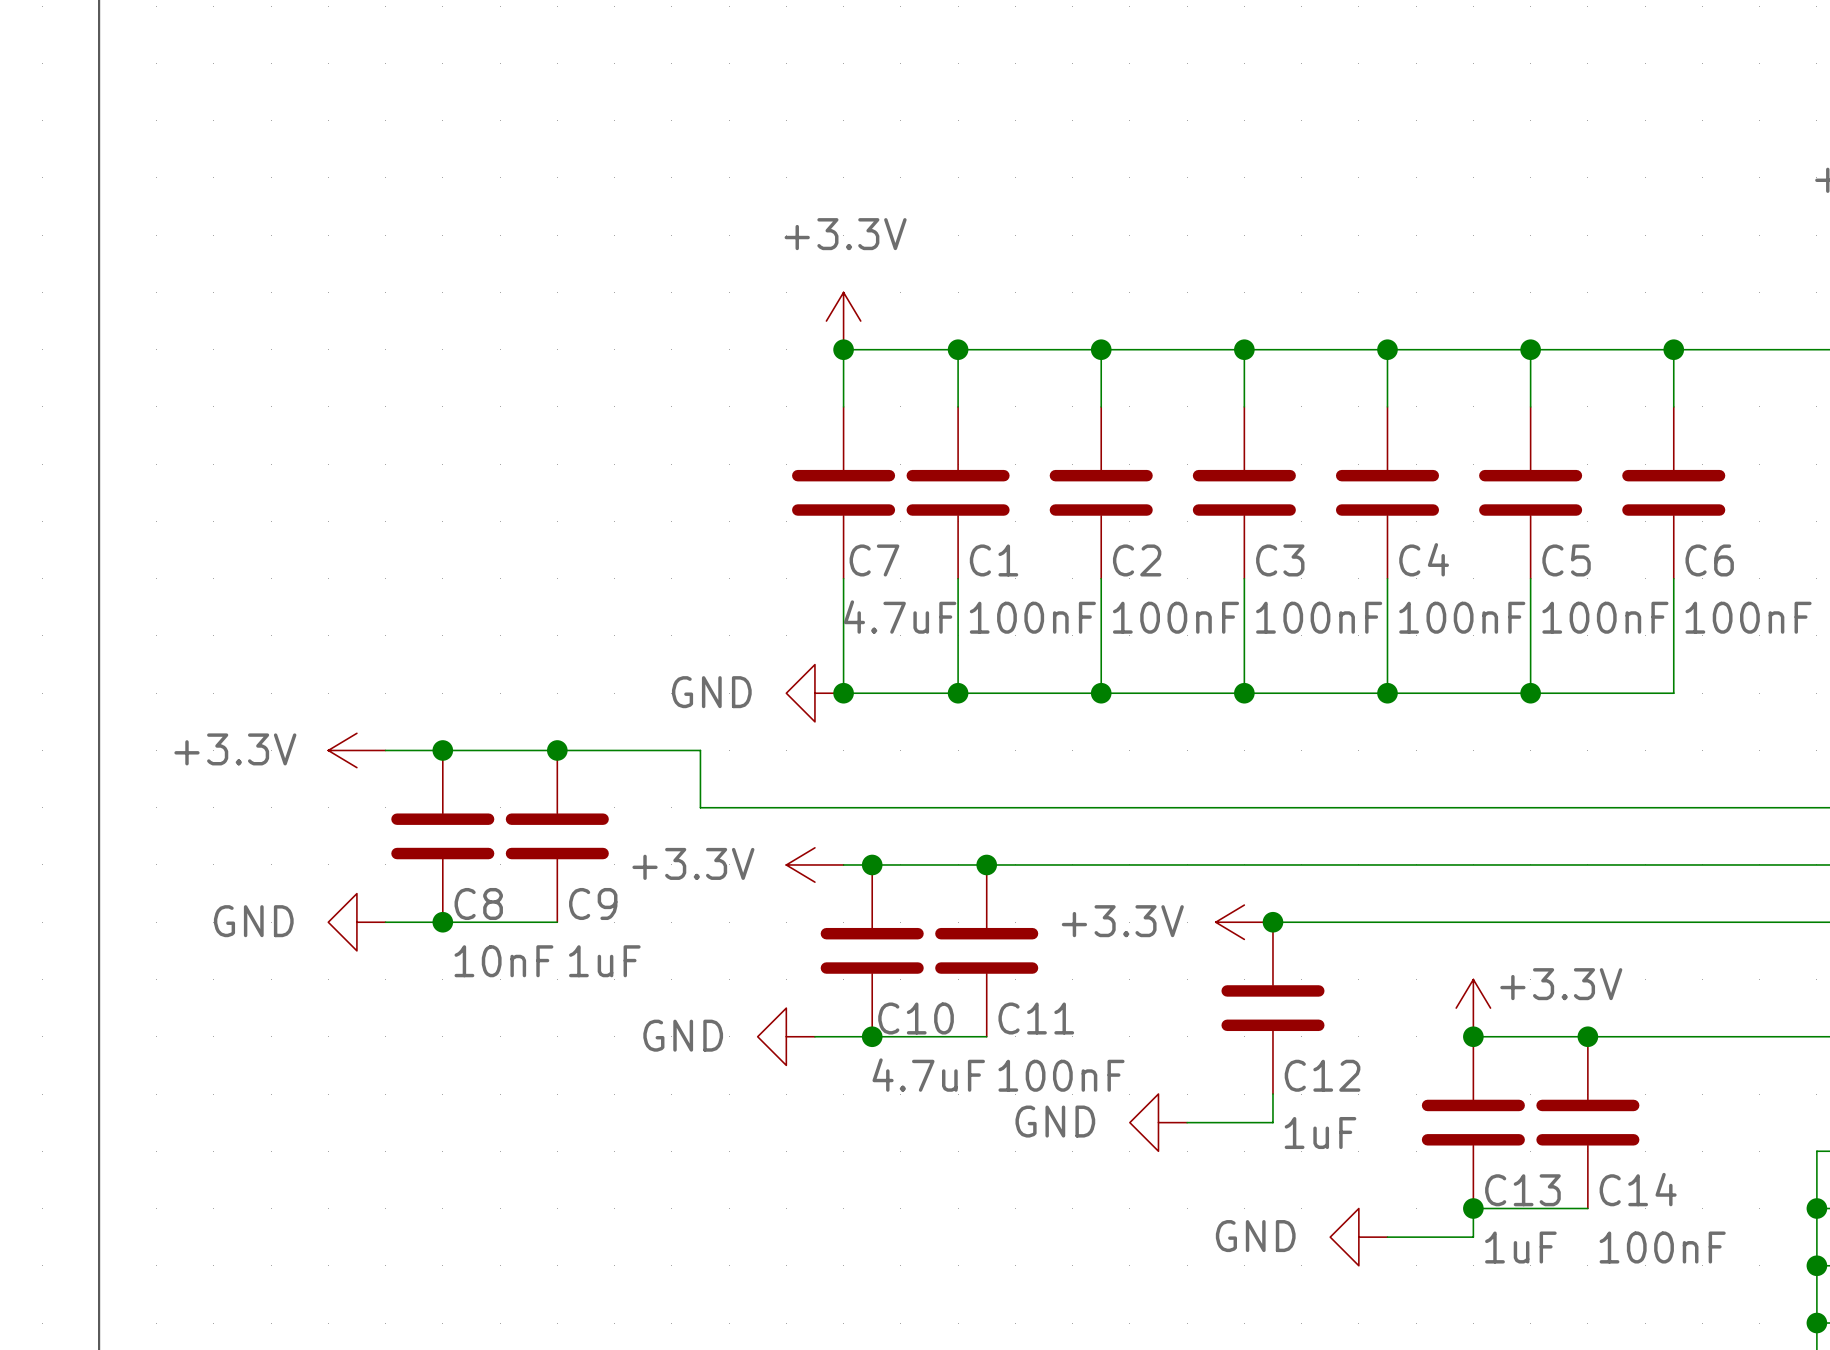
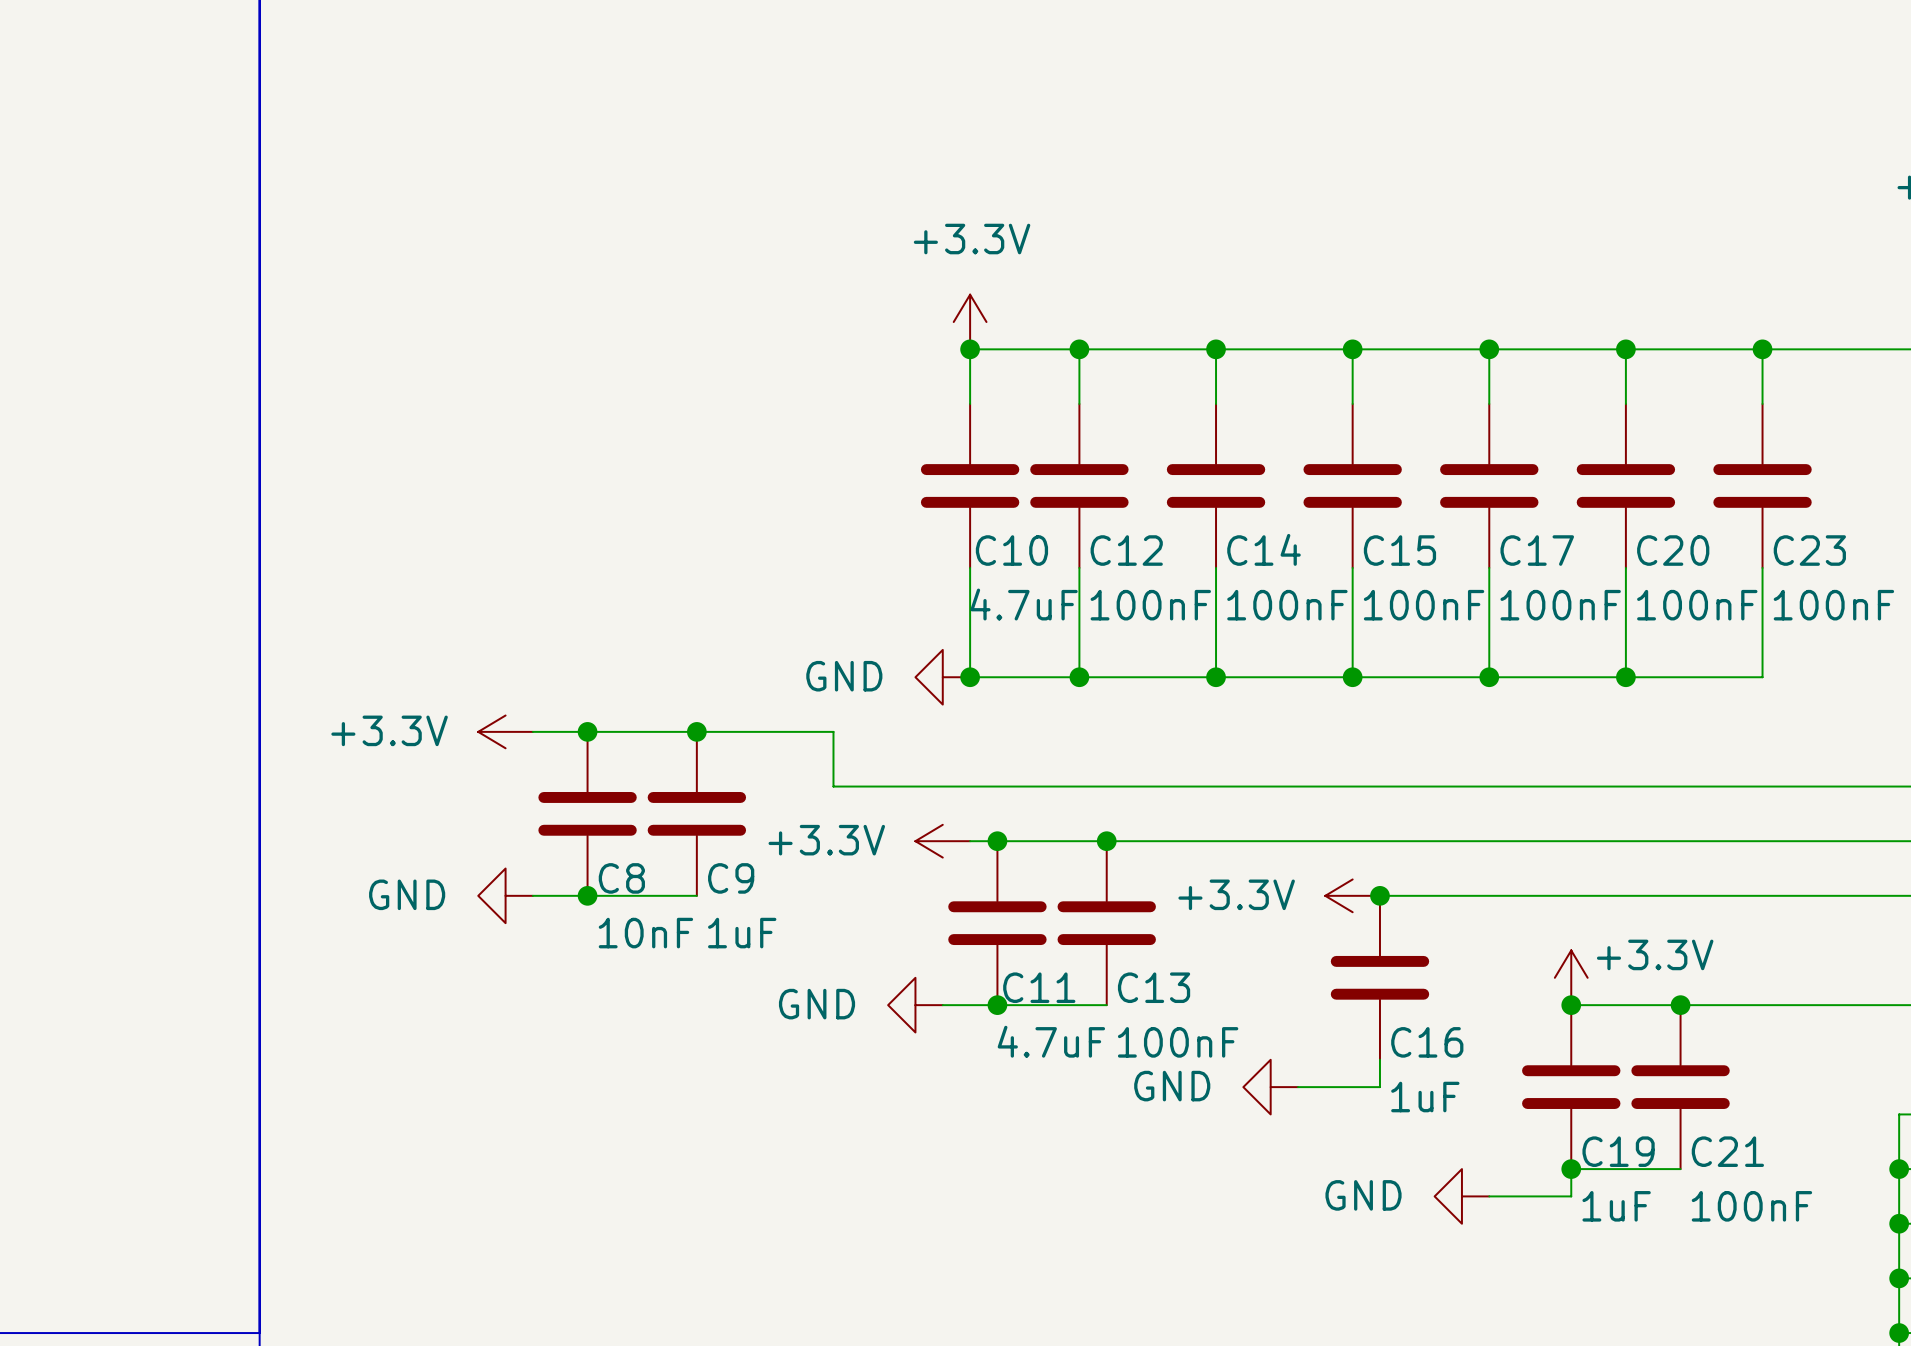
C4 name: C4 (1424, 559) -> C17 (1537, 550)
C7 name: C7 (874, 560) -> C10 (1011, 550)
C1 name: C1 (994, 560) -> C12 (1126, 550)
C2 name: C2 (1137, 560) -> C14 (1263, 549)
C3 name: C3 (1280, 560) -> C15 (1399, 550)
C5 name: C5 (1566, 560) -> C20 (1673, 550)
C6 name: C6 (1709, 560) -> C23 (1809, 550)
C10 name: C10 (916, 1018) -> C11 (1039, 987)
C11 name: C11 (1036, 1018) -> C13 (1154, 987)
C12 name: C12 (1322, 1075) -> C16 (1427, 1042)
C14 name: C14 (1638, 1189) -> C21 (1727, 1151)
C13 name: C13 (1522, 1190) -> C19 (1618, 1151)

